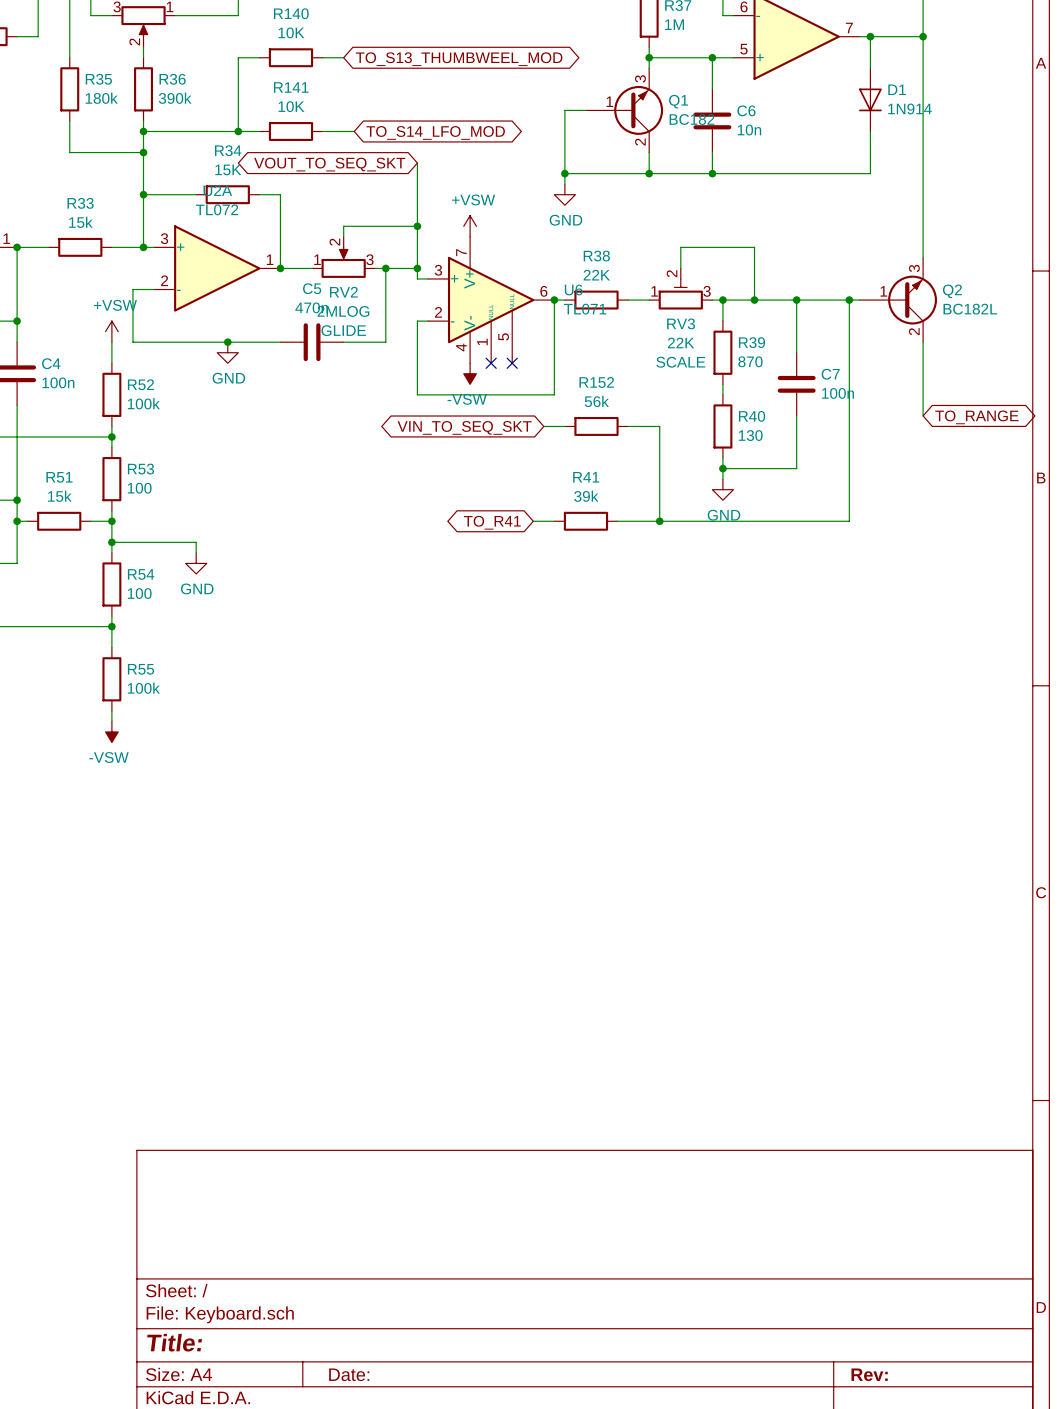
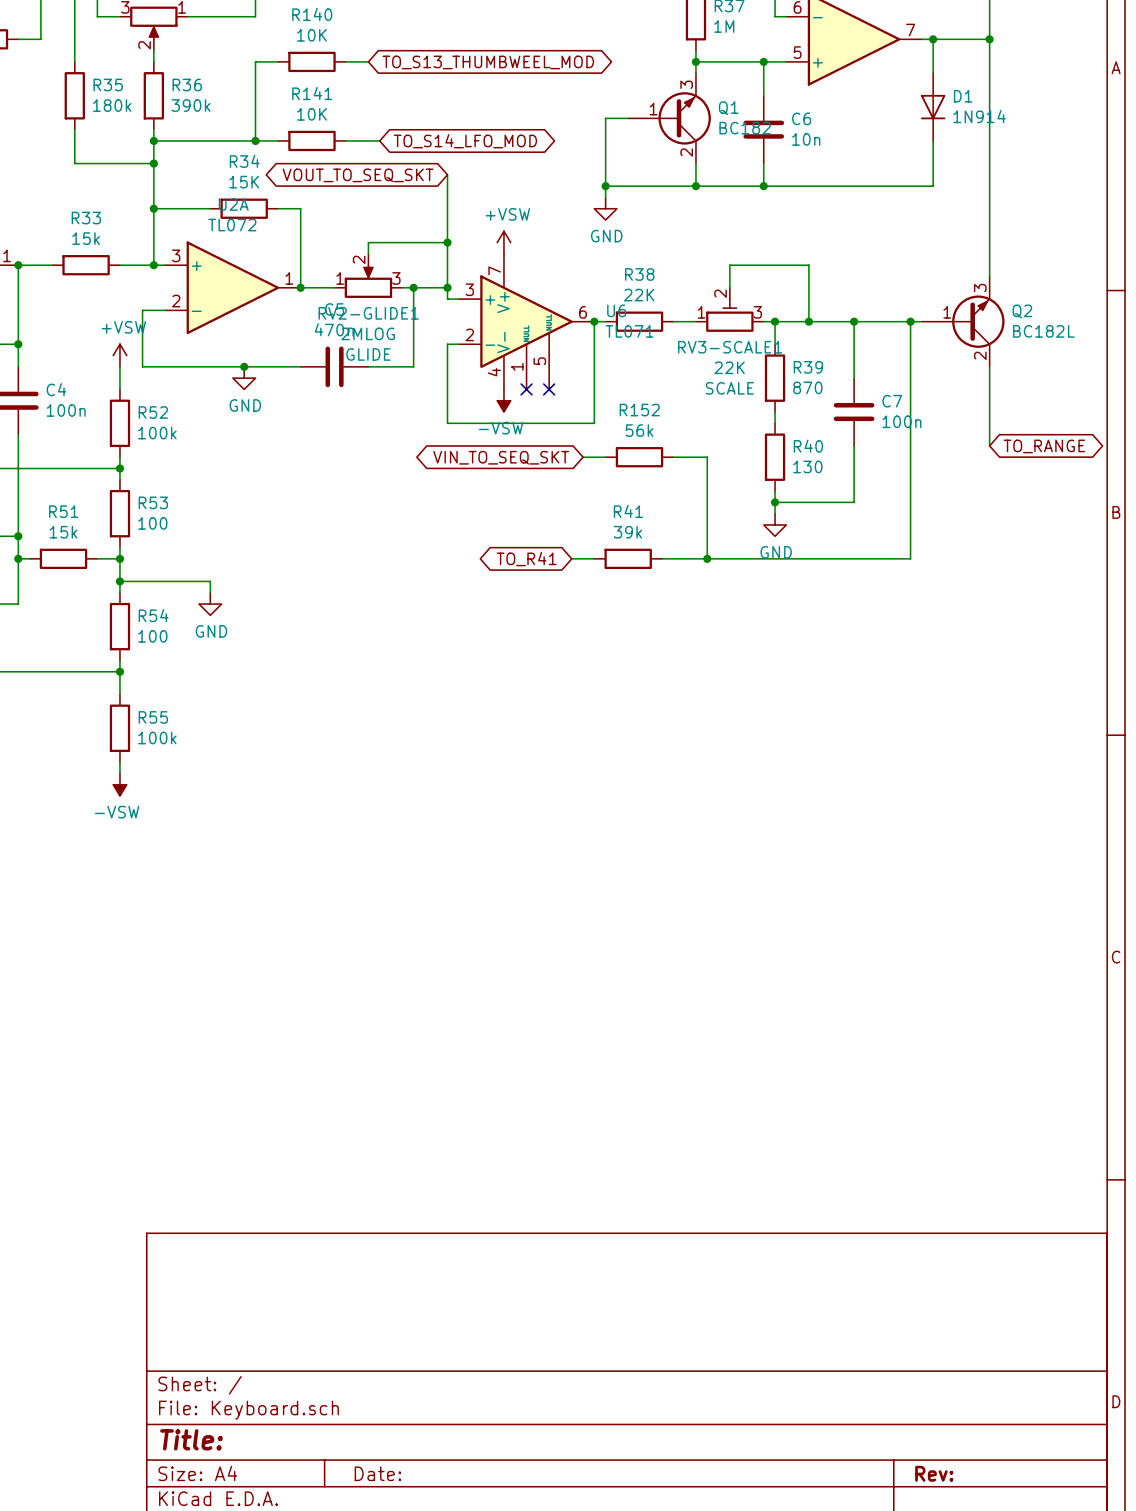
RV2 name: RV2 (343, 292) -> RV2-GLIDE1 (368, 313)
RV3 name: RV3 (681, 323) -> RV3-SCALE1 (730, 347)

